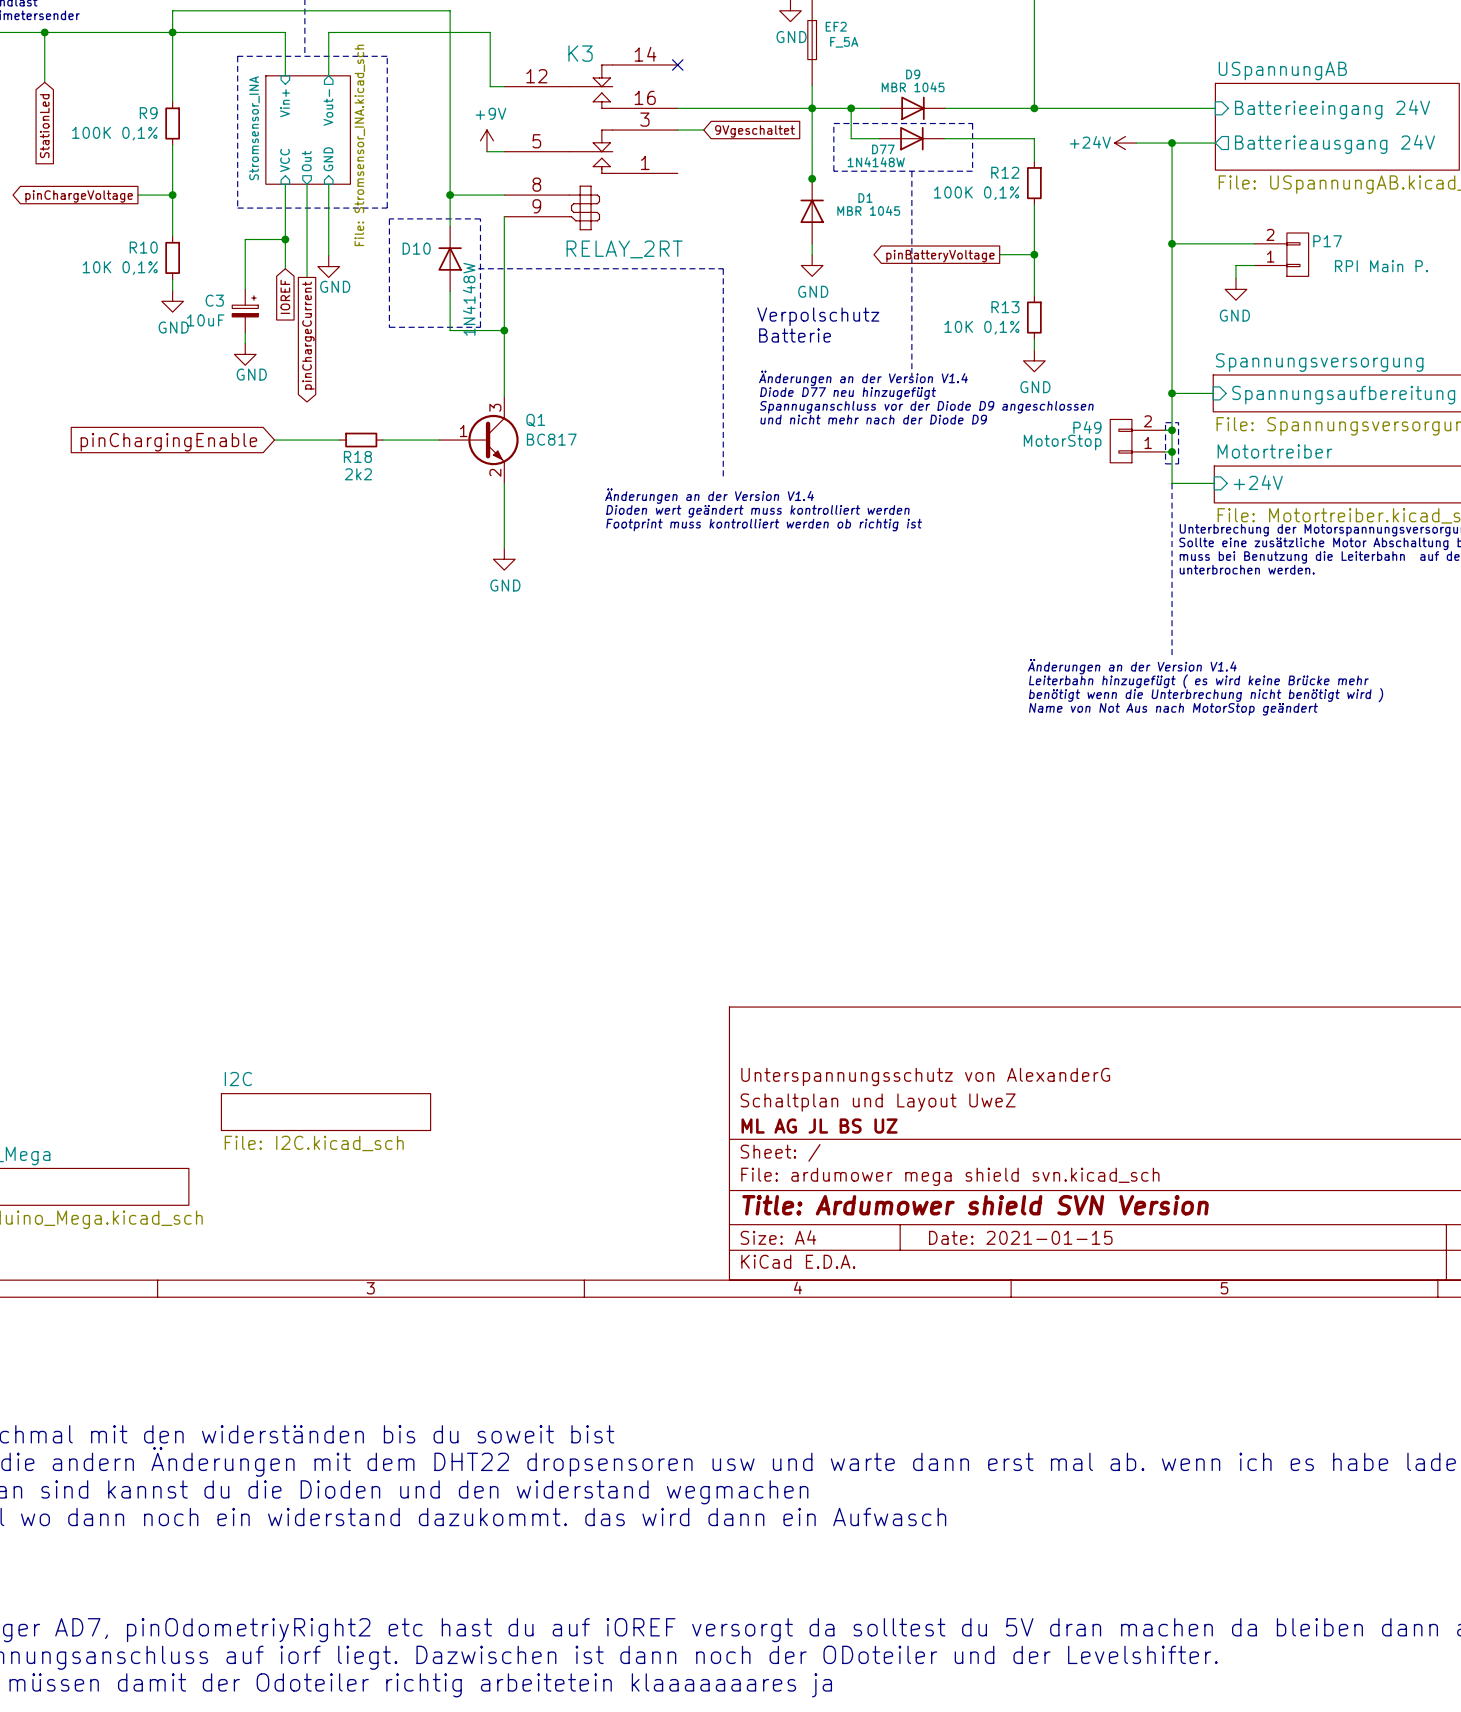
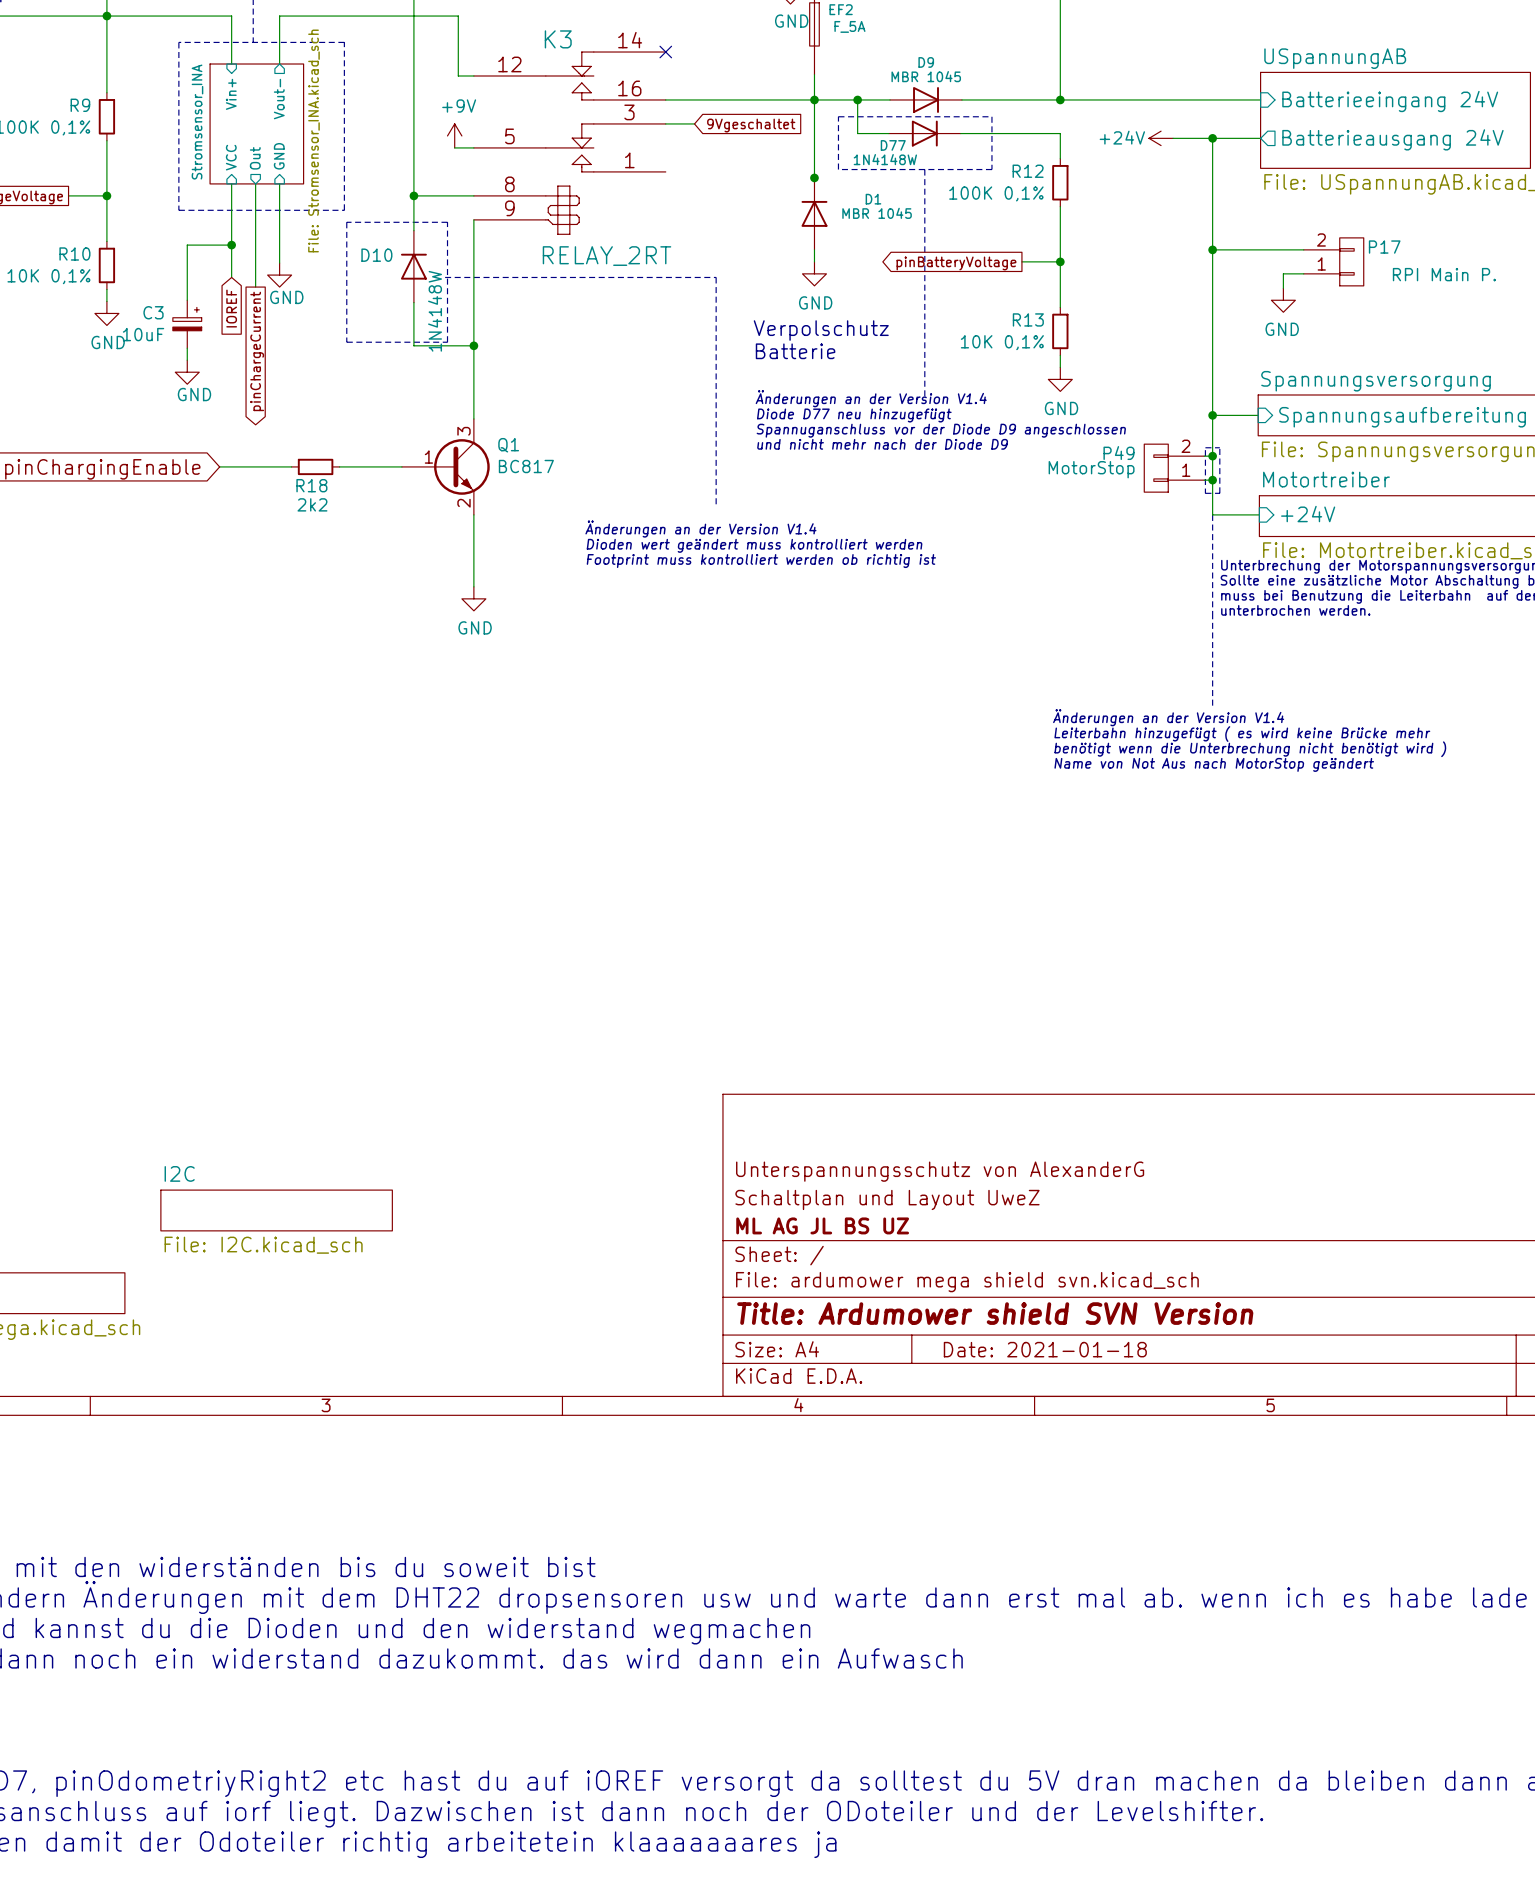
title block: Date: 2021-01-15 (1020, 1237) -> Date: 2021-01-18 (1045, 1349)

